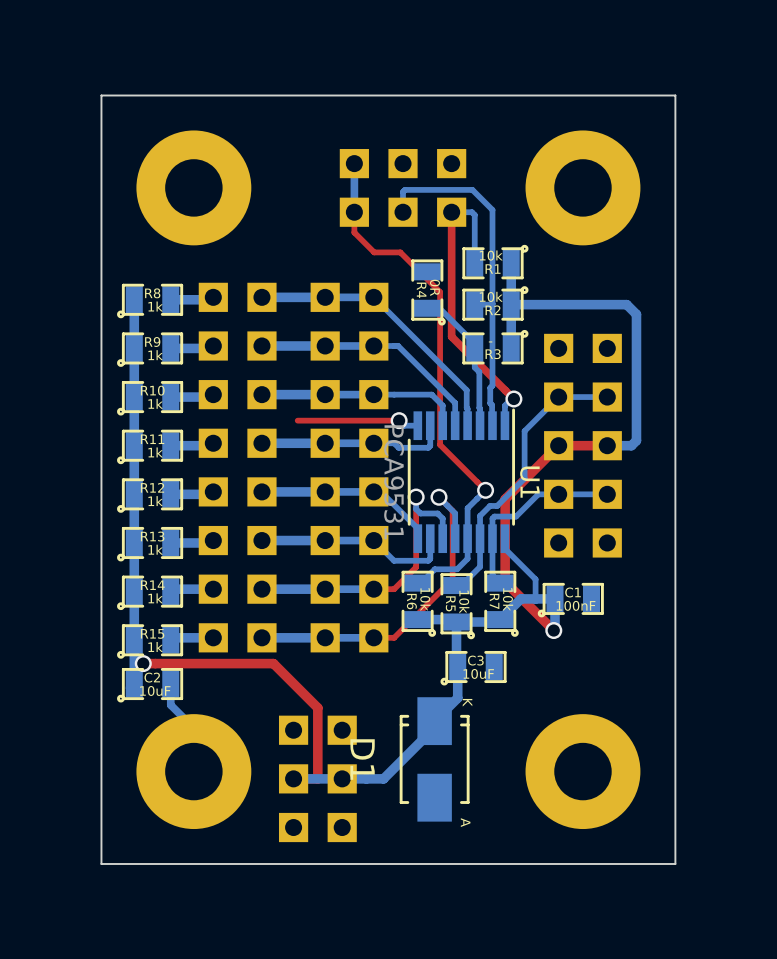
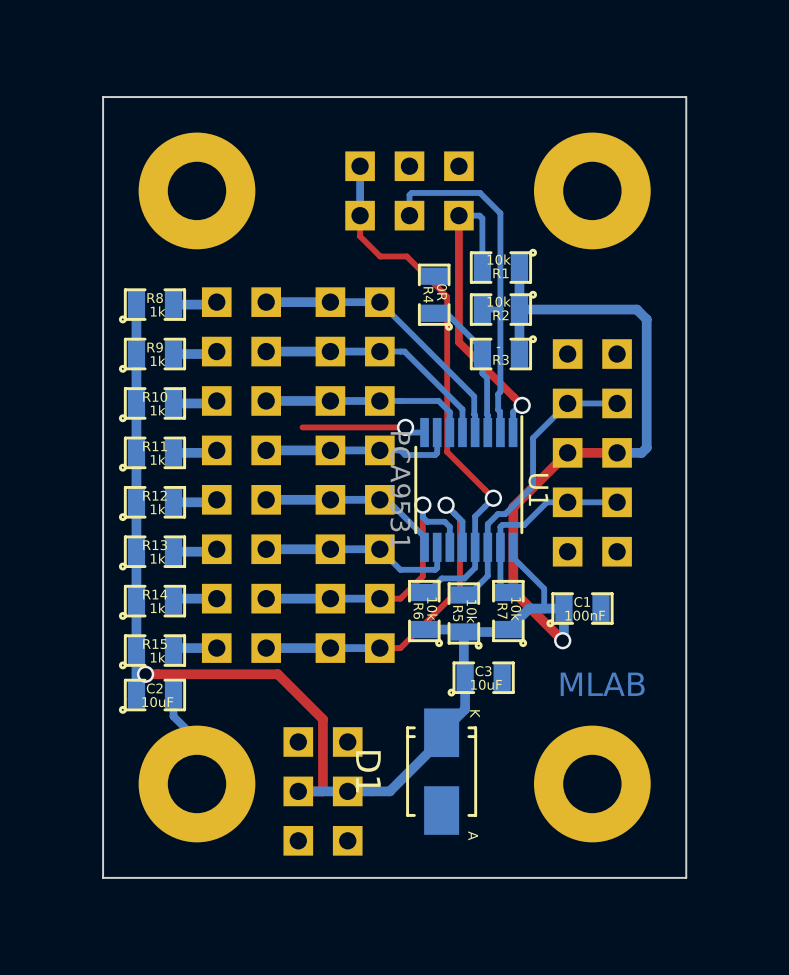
text: none -> MLAB (602, 684)

